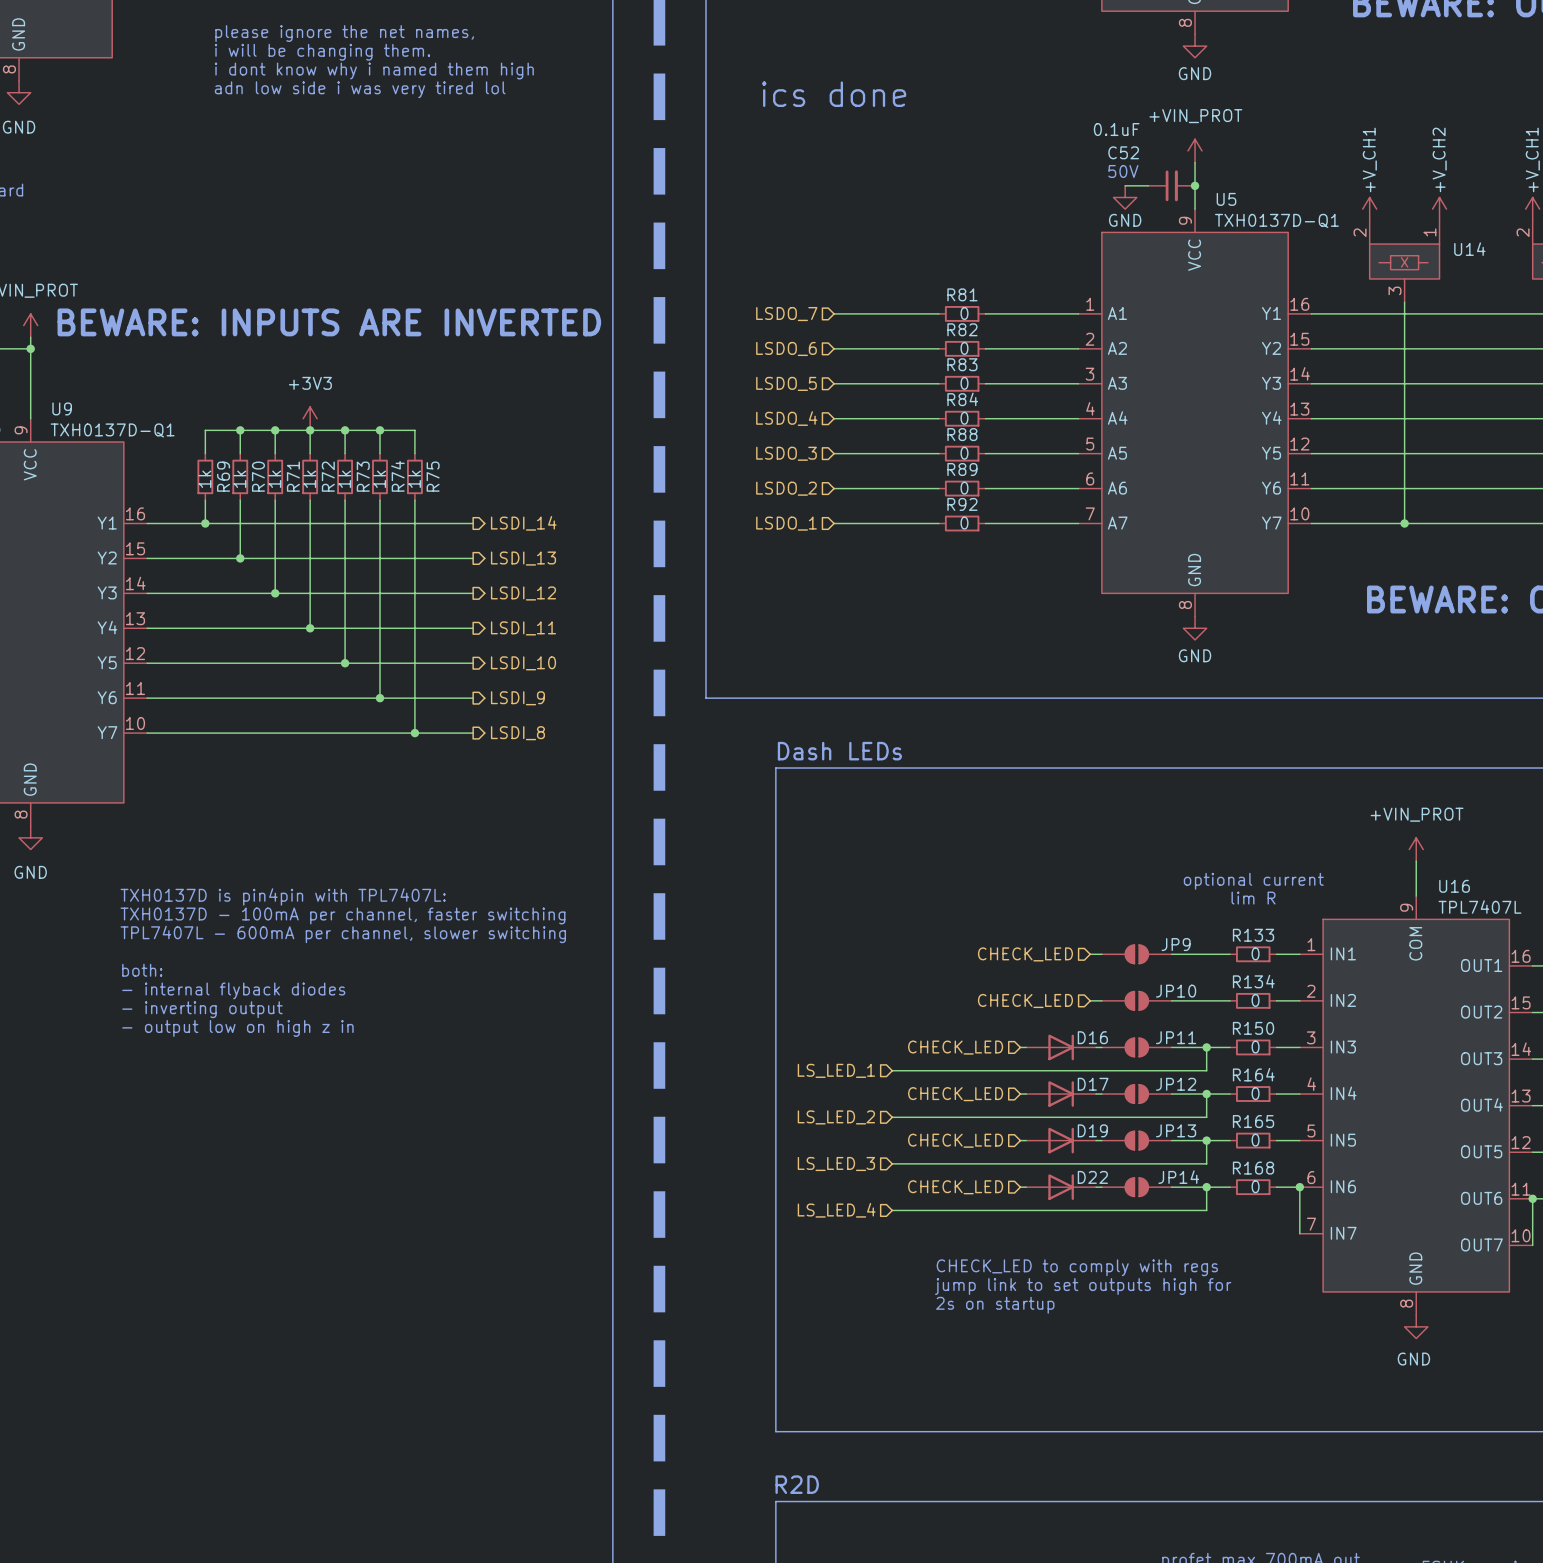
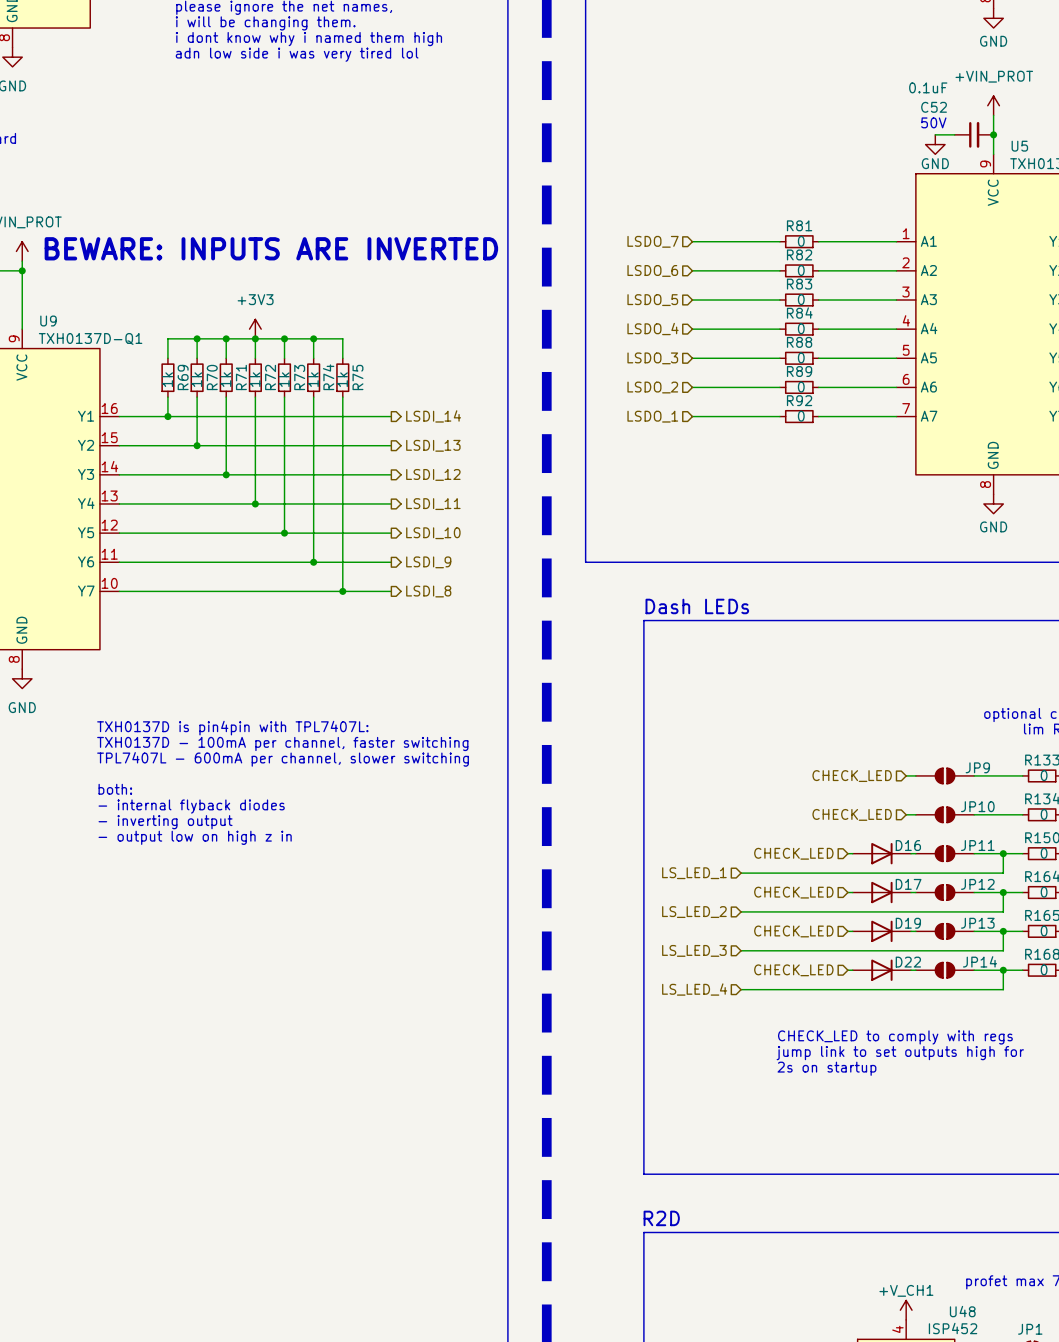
text: ics done (834, 94) -> none

